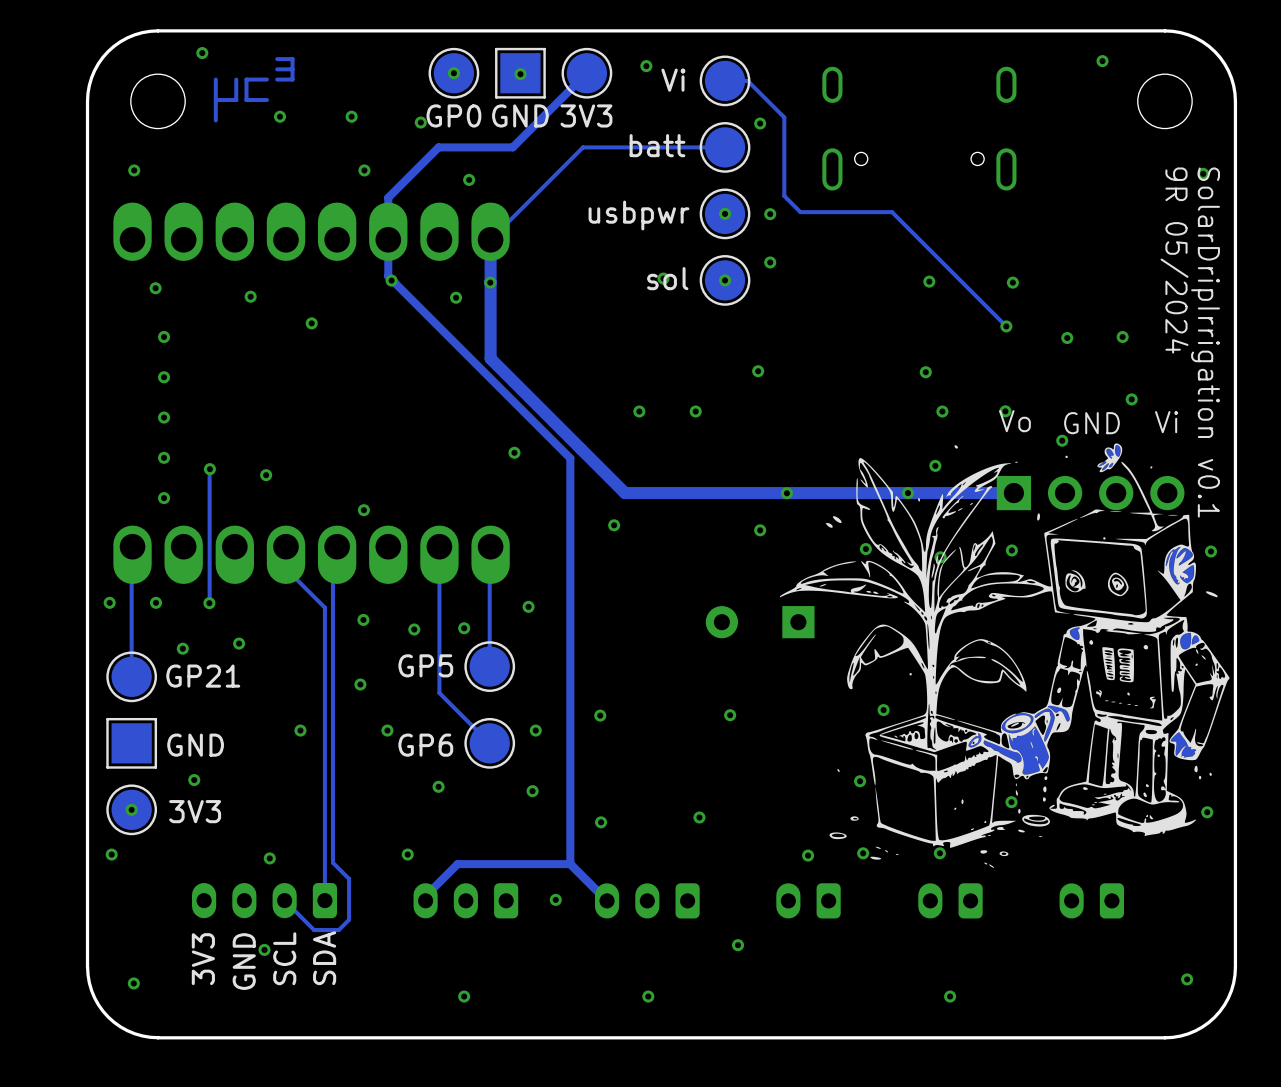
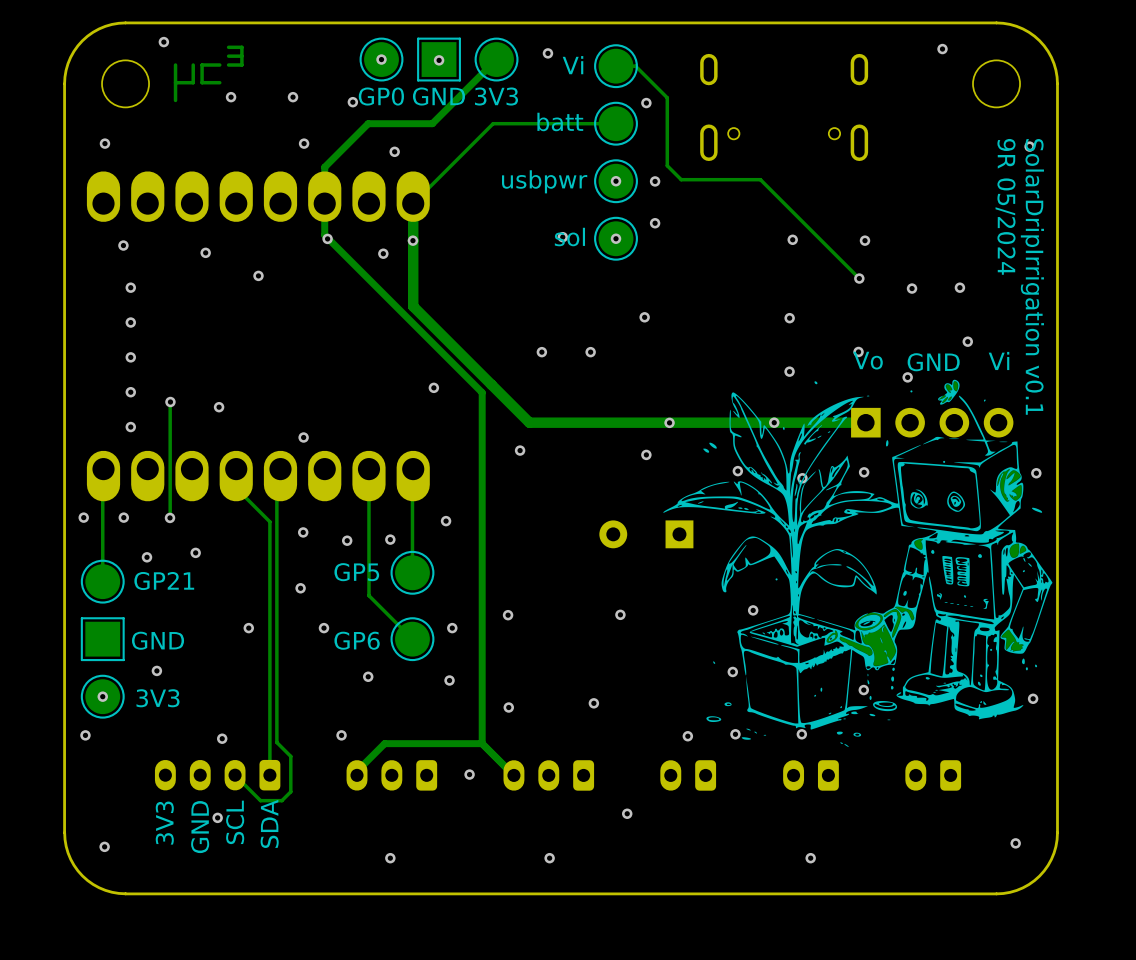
via: (942, 411) -> none
via: none -> (789, 371)
via: (935, 465) -> none

